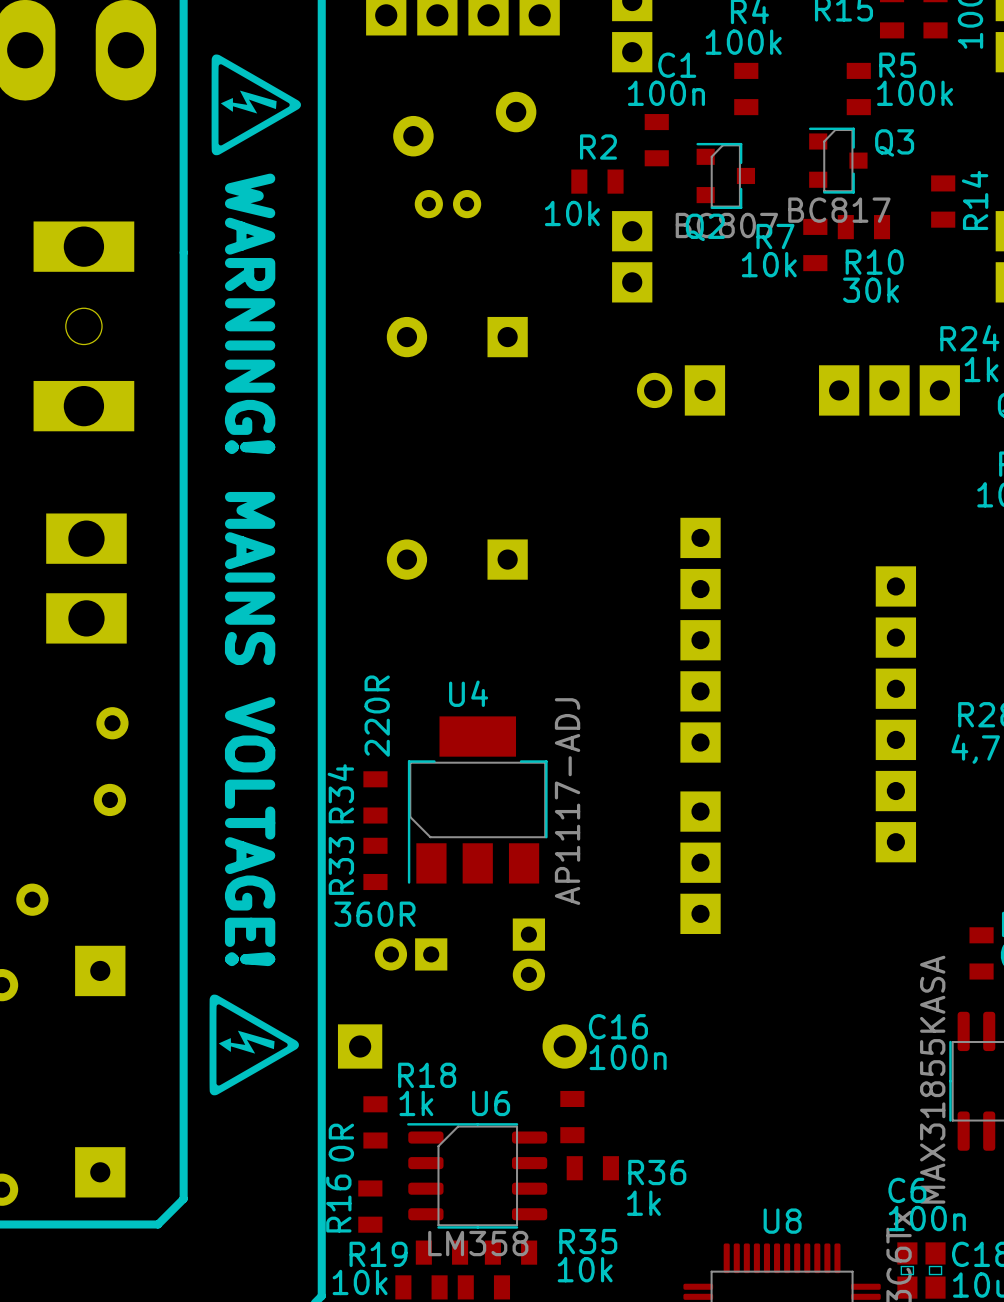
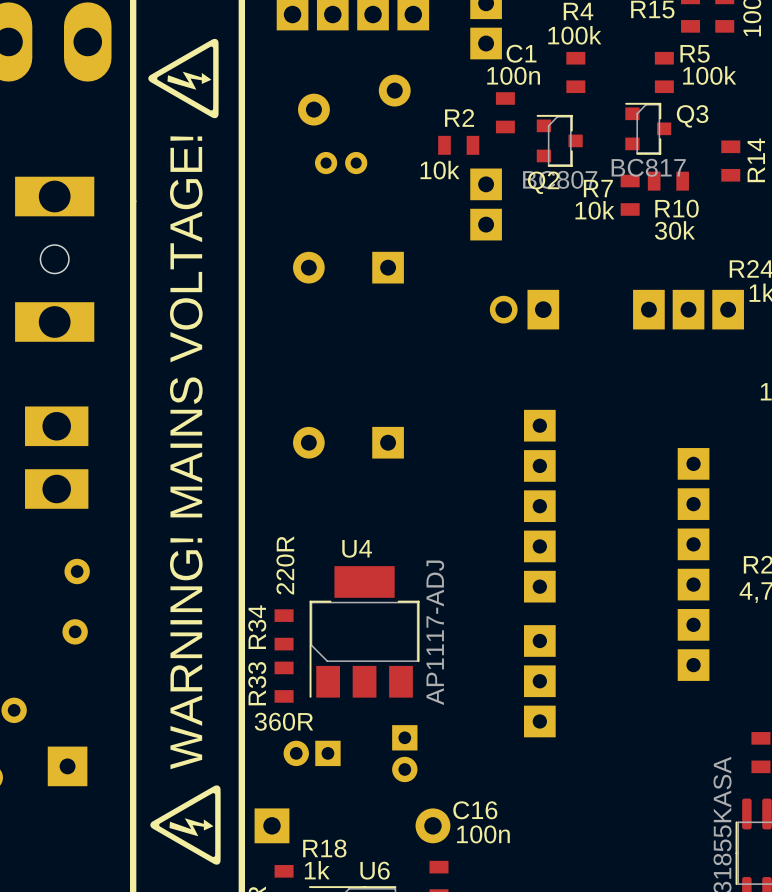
drawing shape: [211, 54, 301, 156] -> [148, 38, 219, 119]
text rotation: 0° (250, 569) -> 180° (186, 452)
drawing shape: [209, 994, 299, 1096] -> [150, 785, 221, 865]

